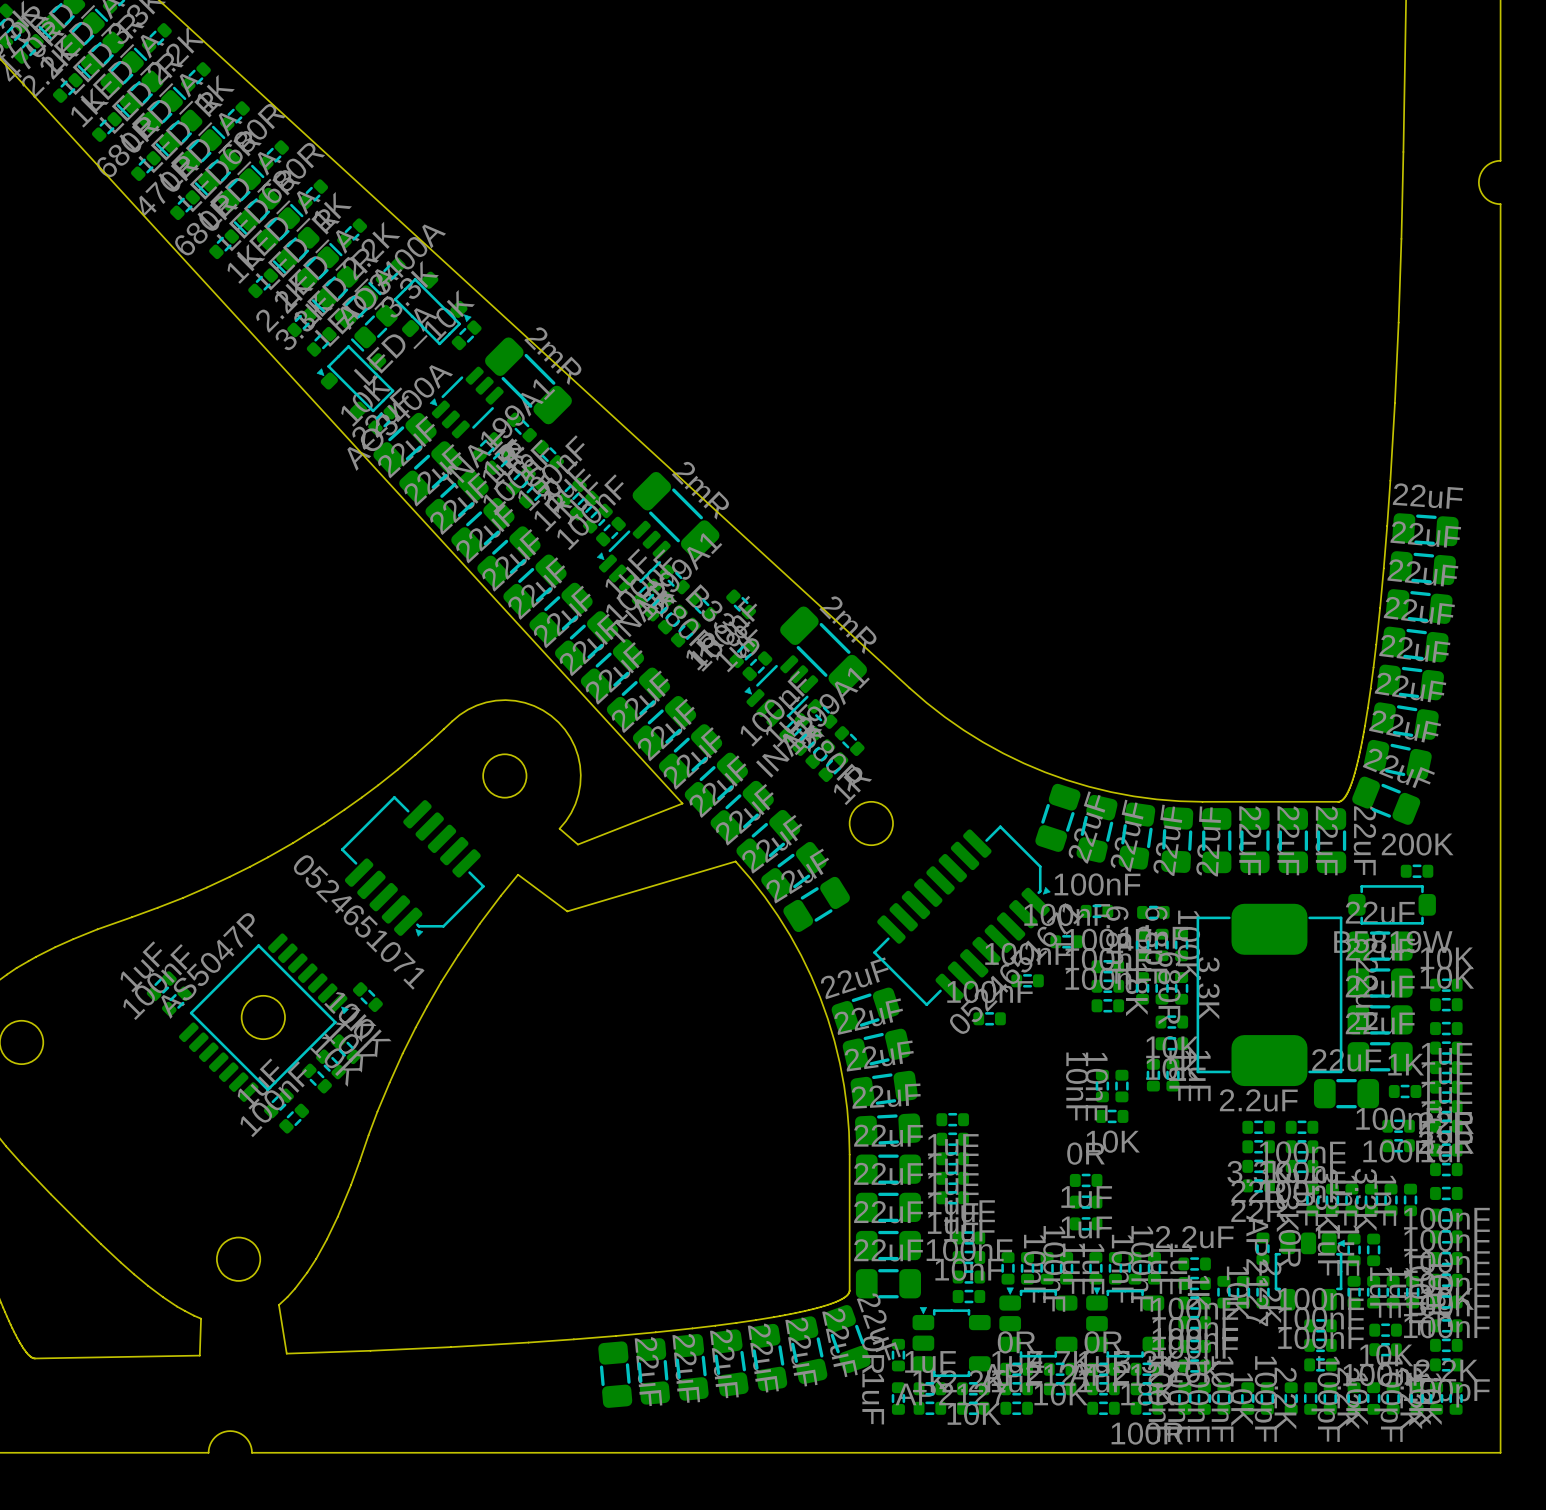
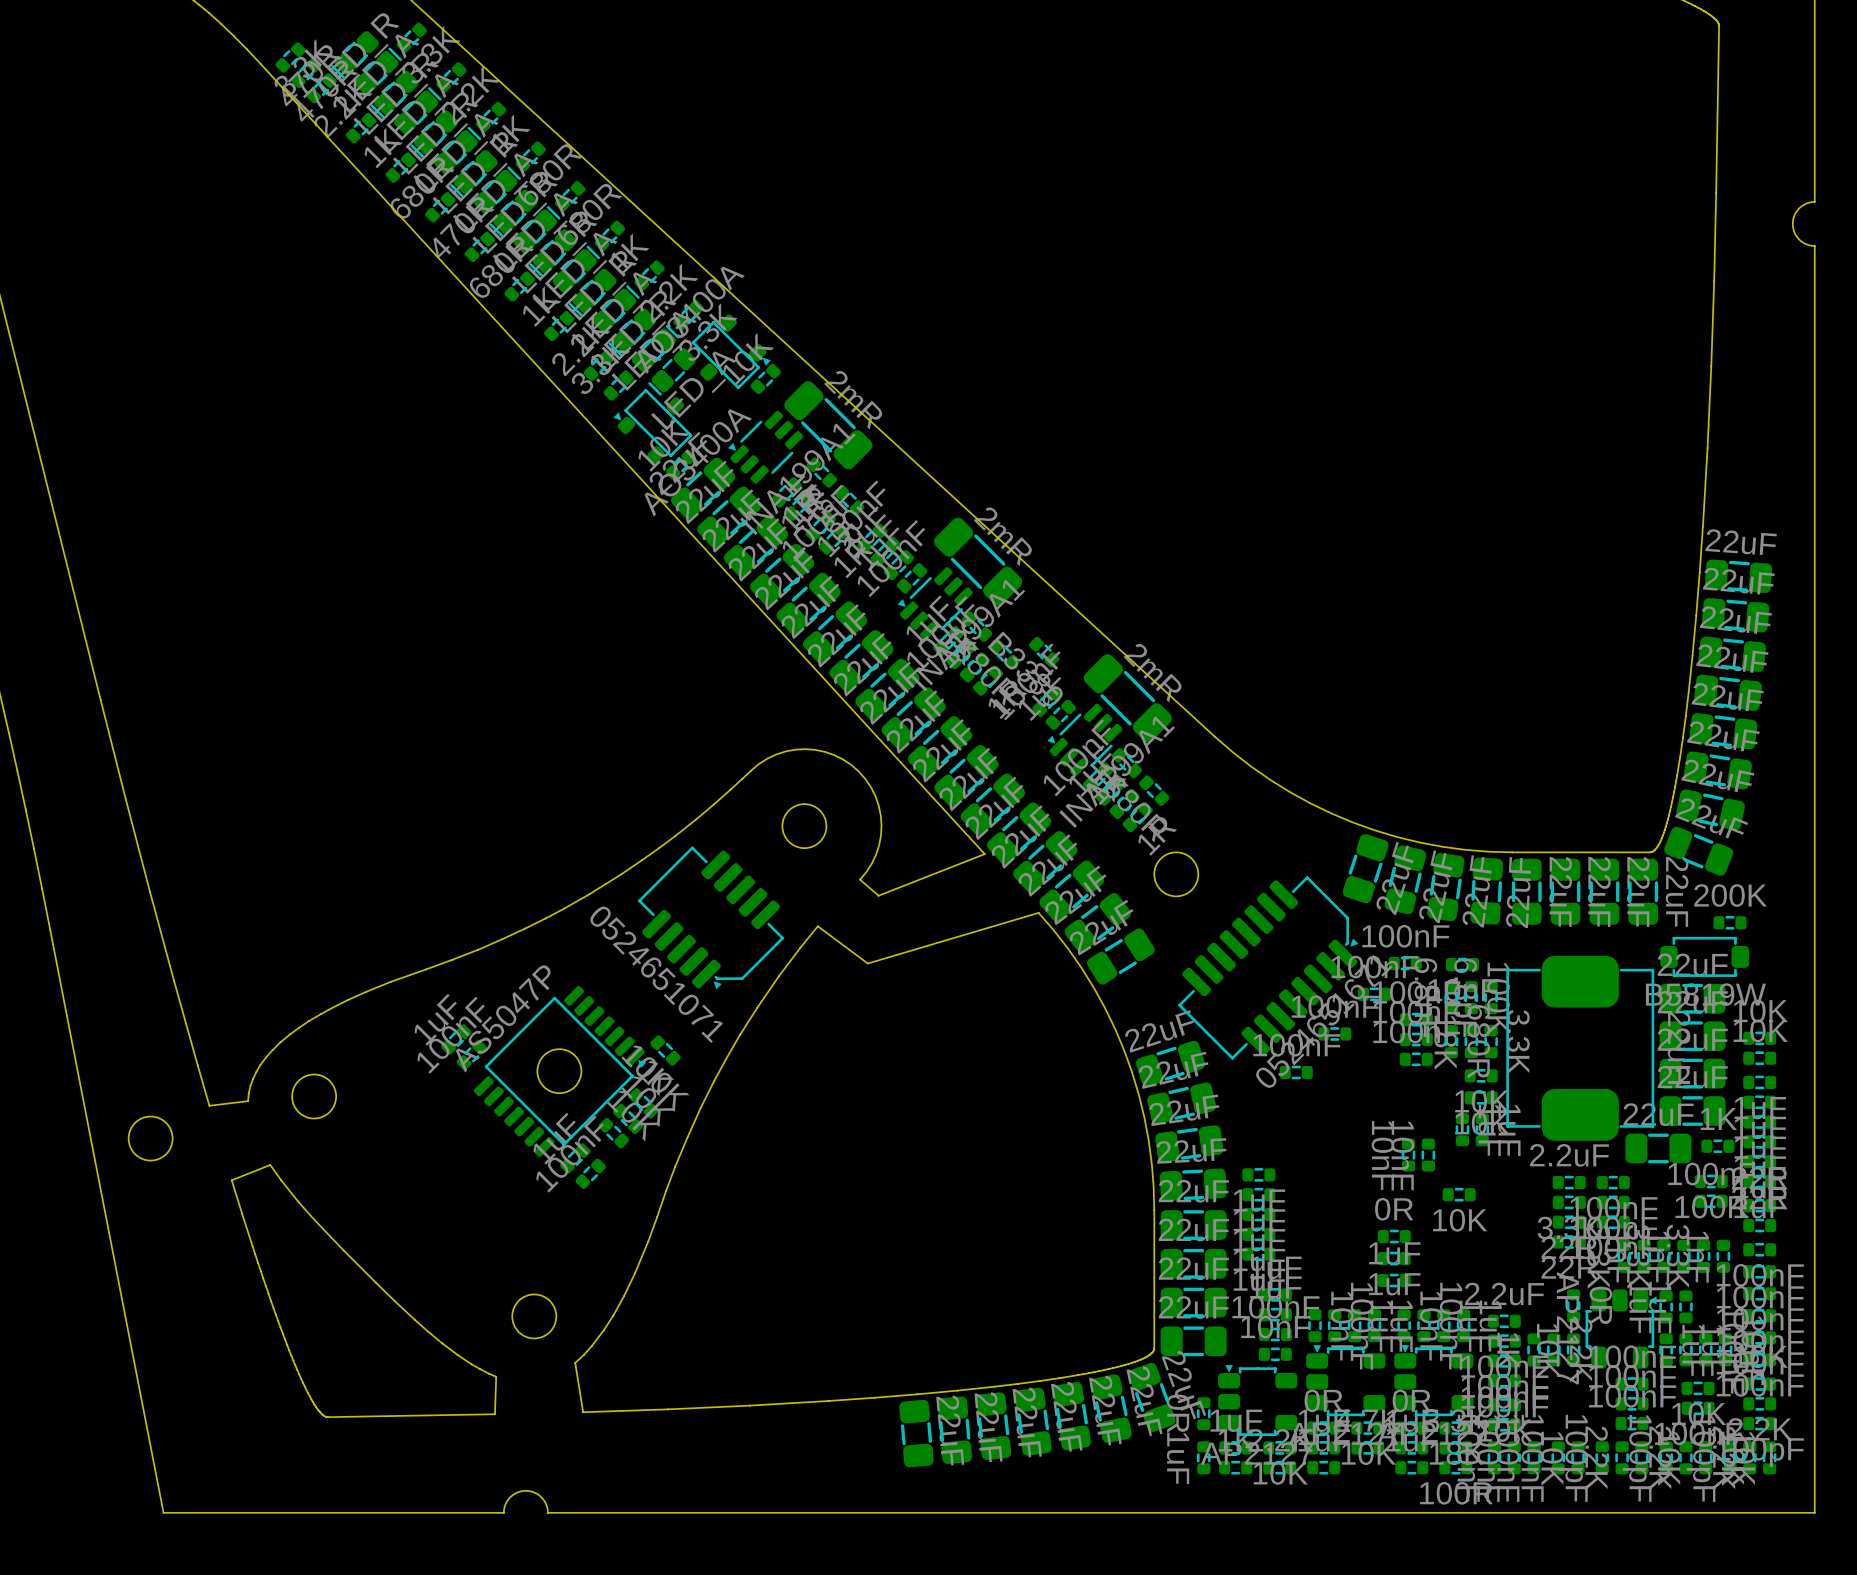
part: 10nF (1102, 1086) -> none
part: 10nF (1121, 1086) -> none
part: none -> 10nF (1408, 1155)
part: none -> 10nF (1428, 1155)
part position: (1112, 1116) -> (1459, 1194)

